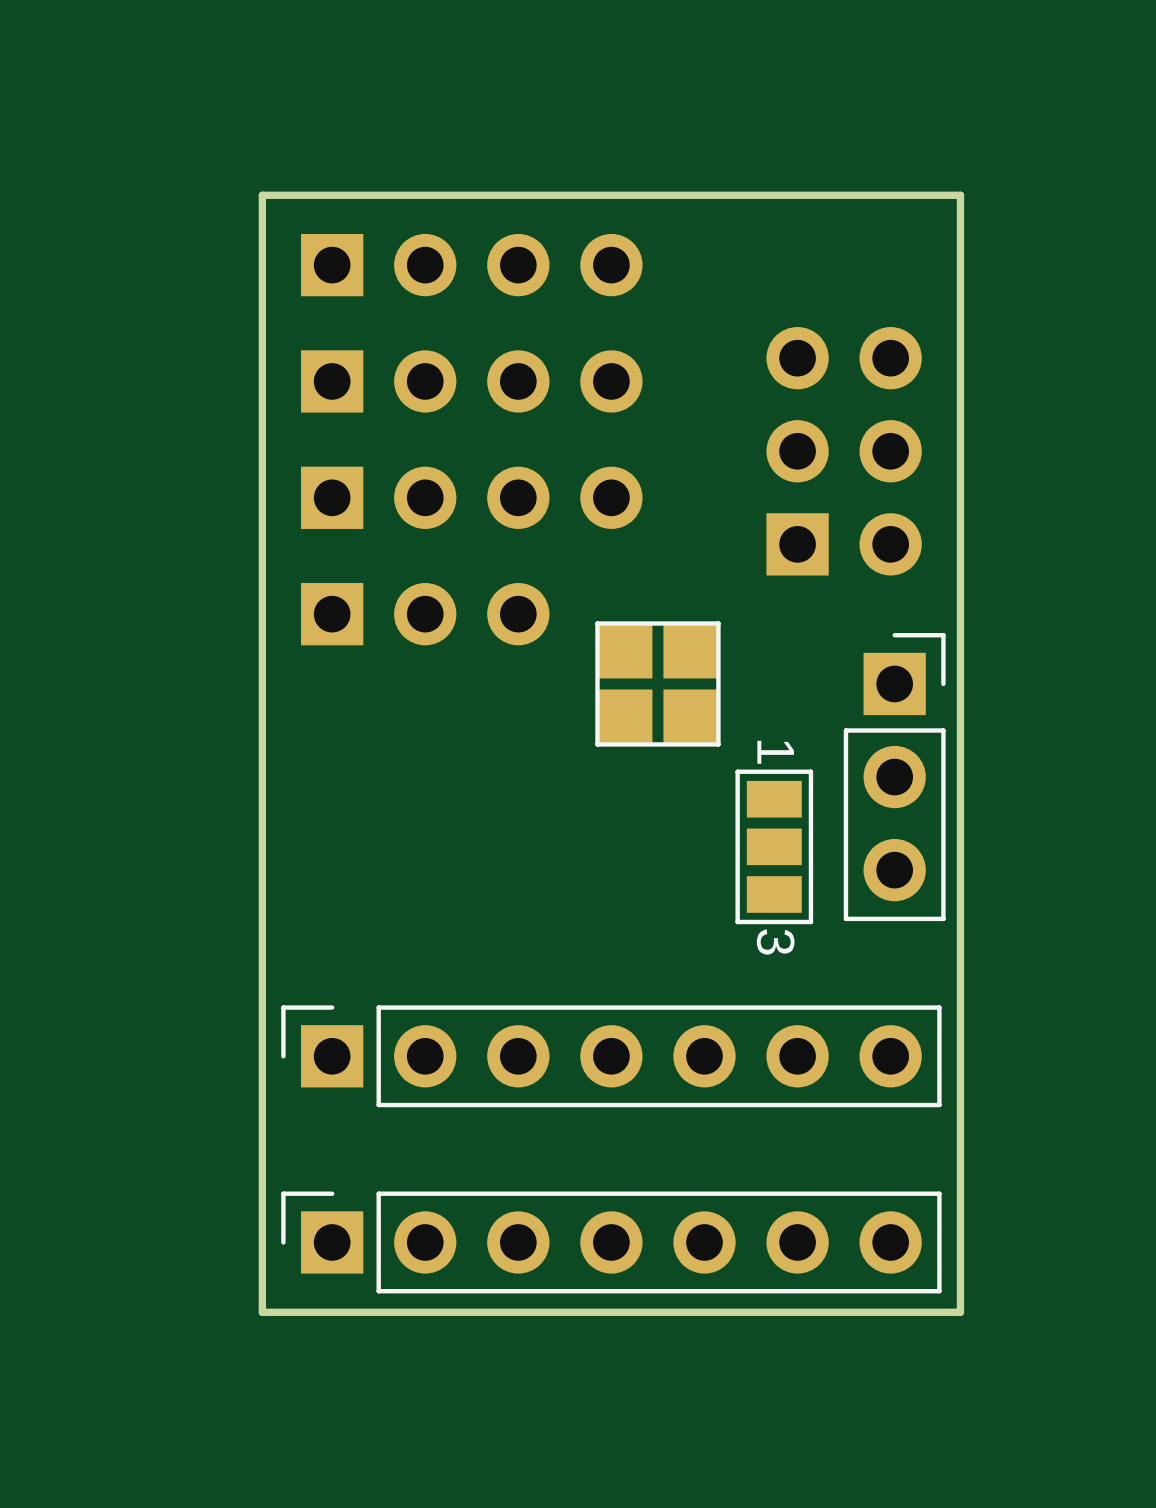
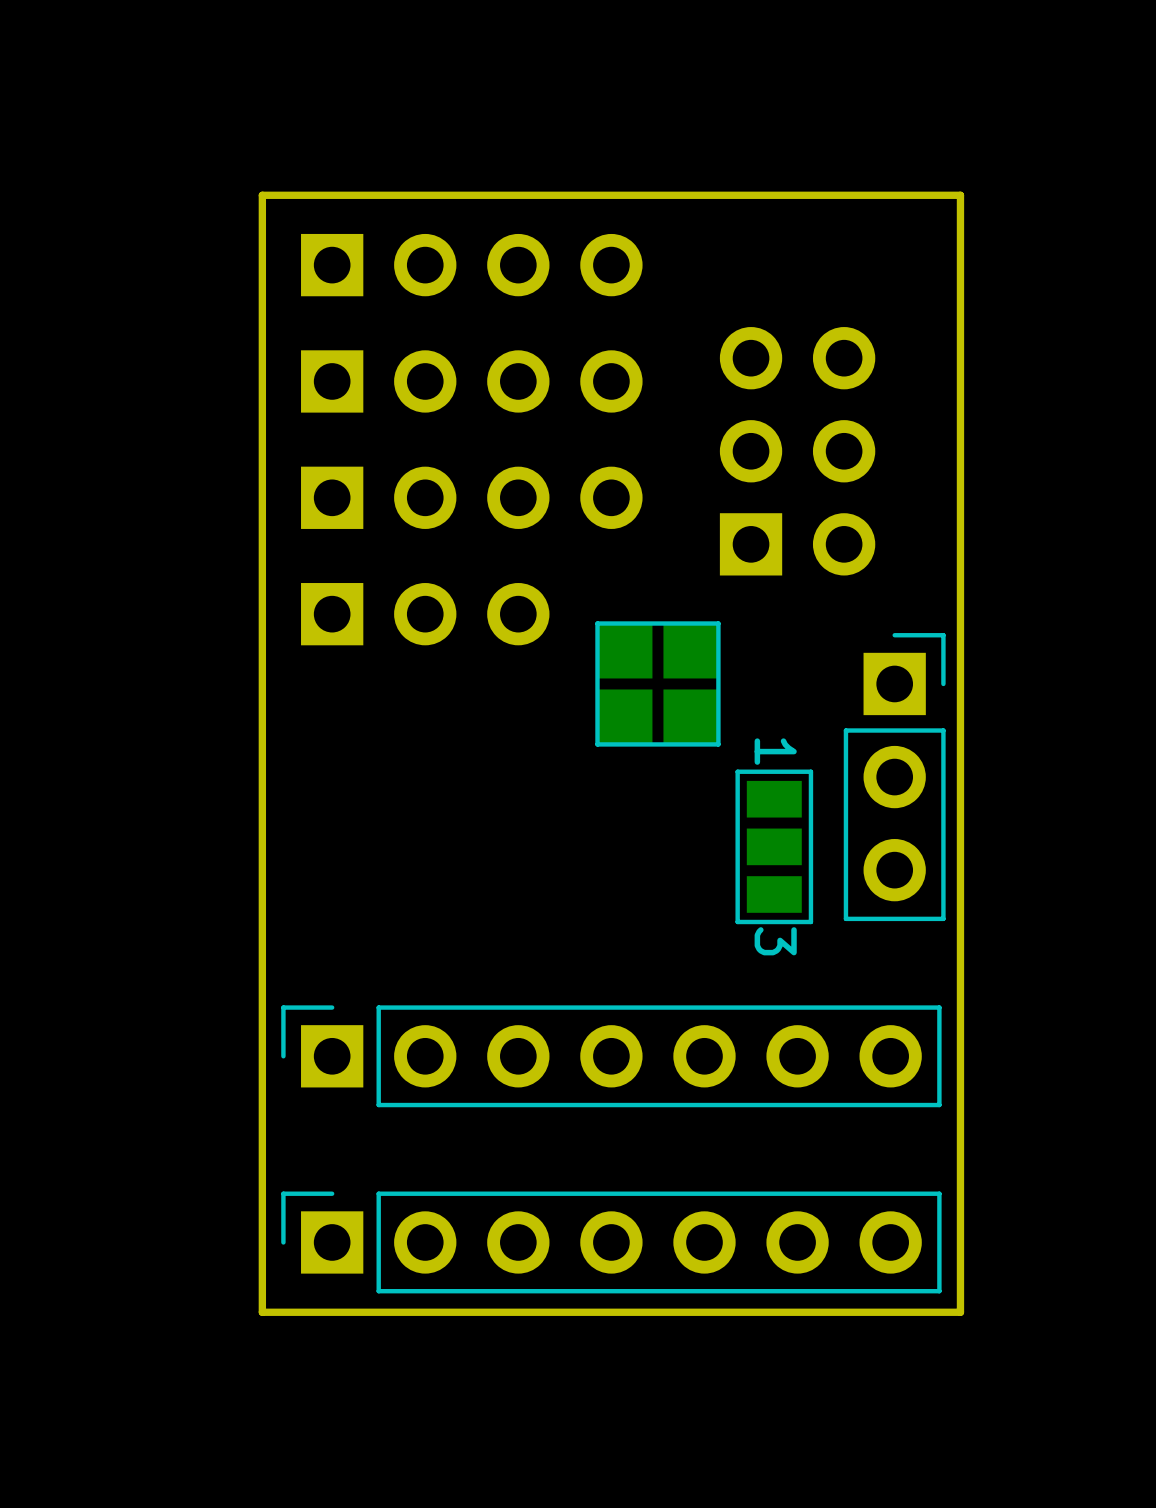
part position: (844, 451) -> (797, 451)

